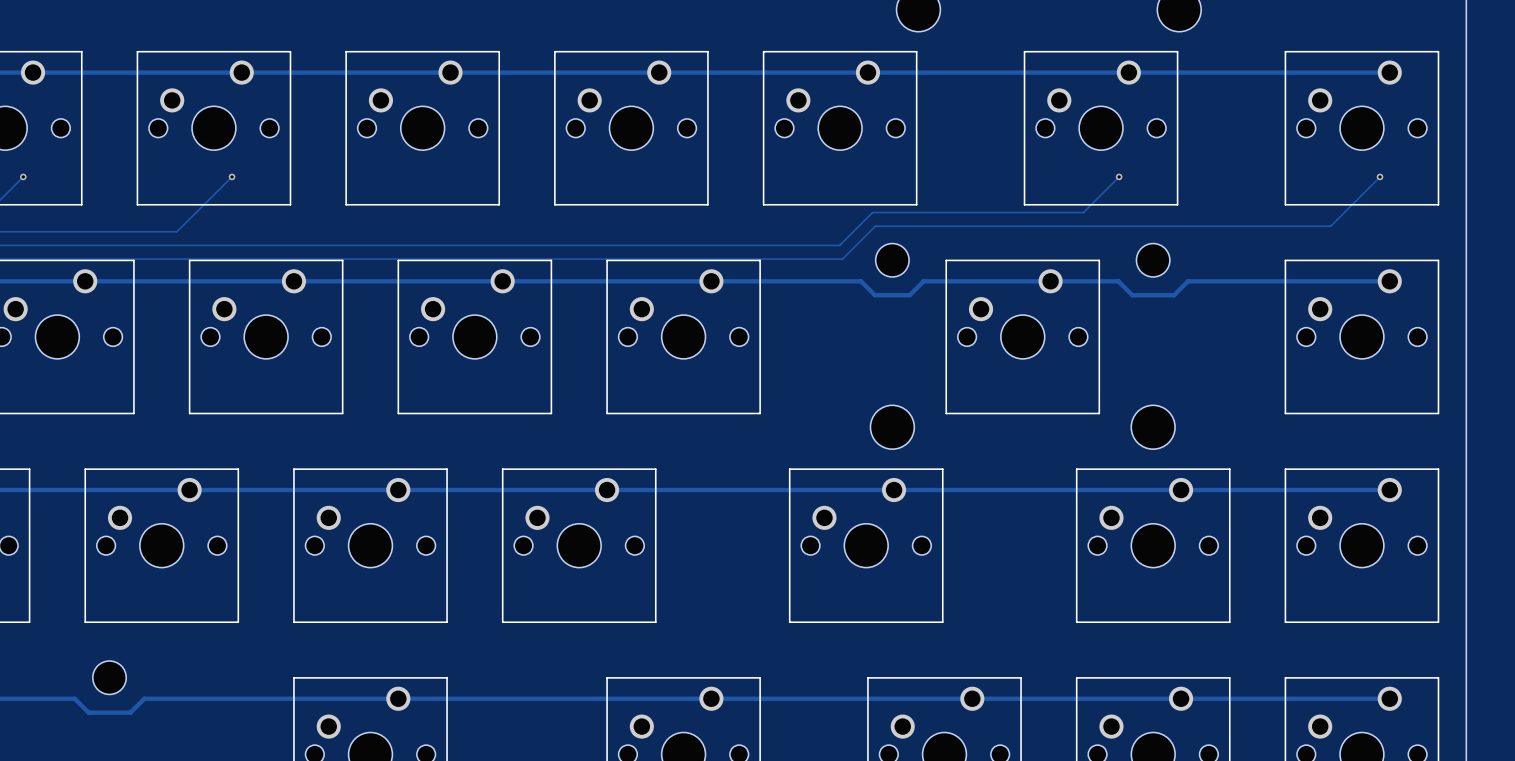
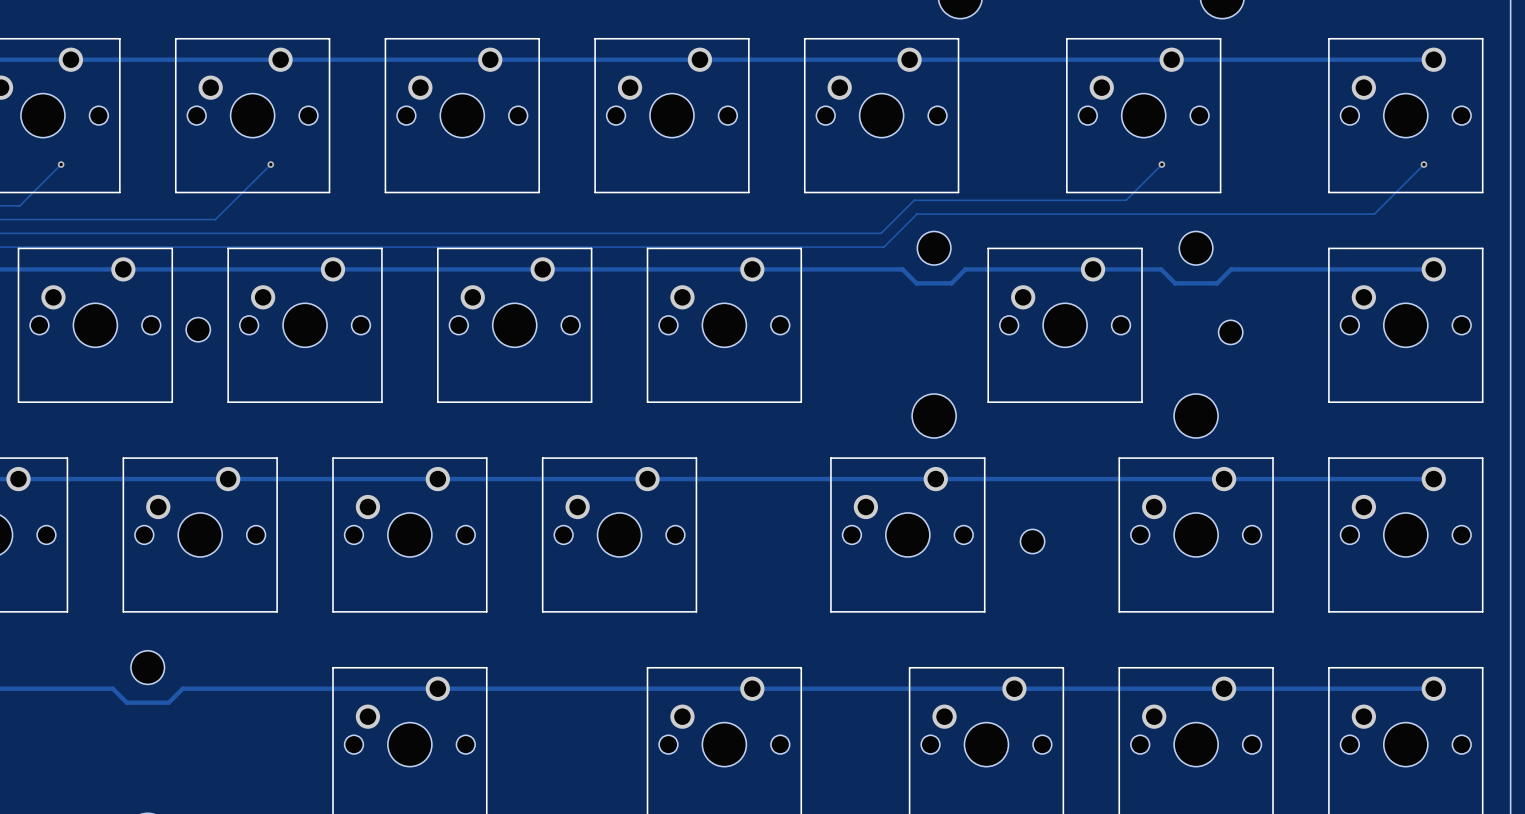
part: none -> (198, 329)
part: none -> (1230, 332)
part: none -> (1032, 541)

